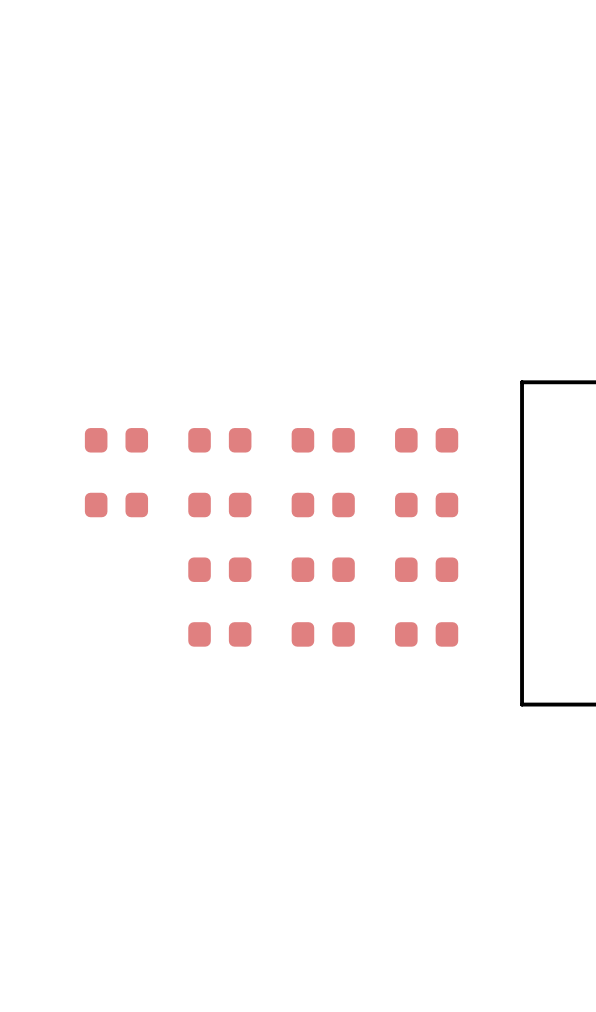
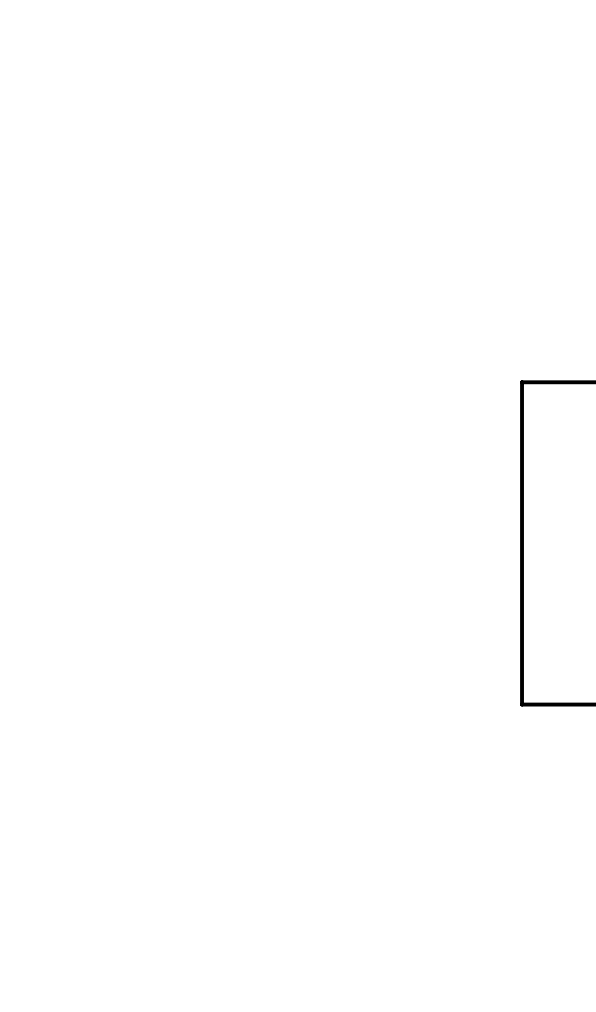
part: (116, 440) -> none
part: (219, 440) -> none
part: (323, 440) -> none
part: (426, 440) -> none
part: (116, 505) -> none
part: (219, 505) -> none
part: (323, 505) -> none
part: (426, 505) -> none
part: (219, 569) -> none
part: (323, 569) -> none
part: (426, 569) -> none
part: (219, 634) -> none
part: (323, 634) -> none
part: (426, 634) -> none

